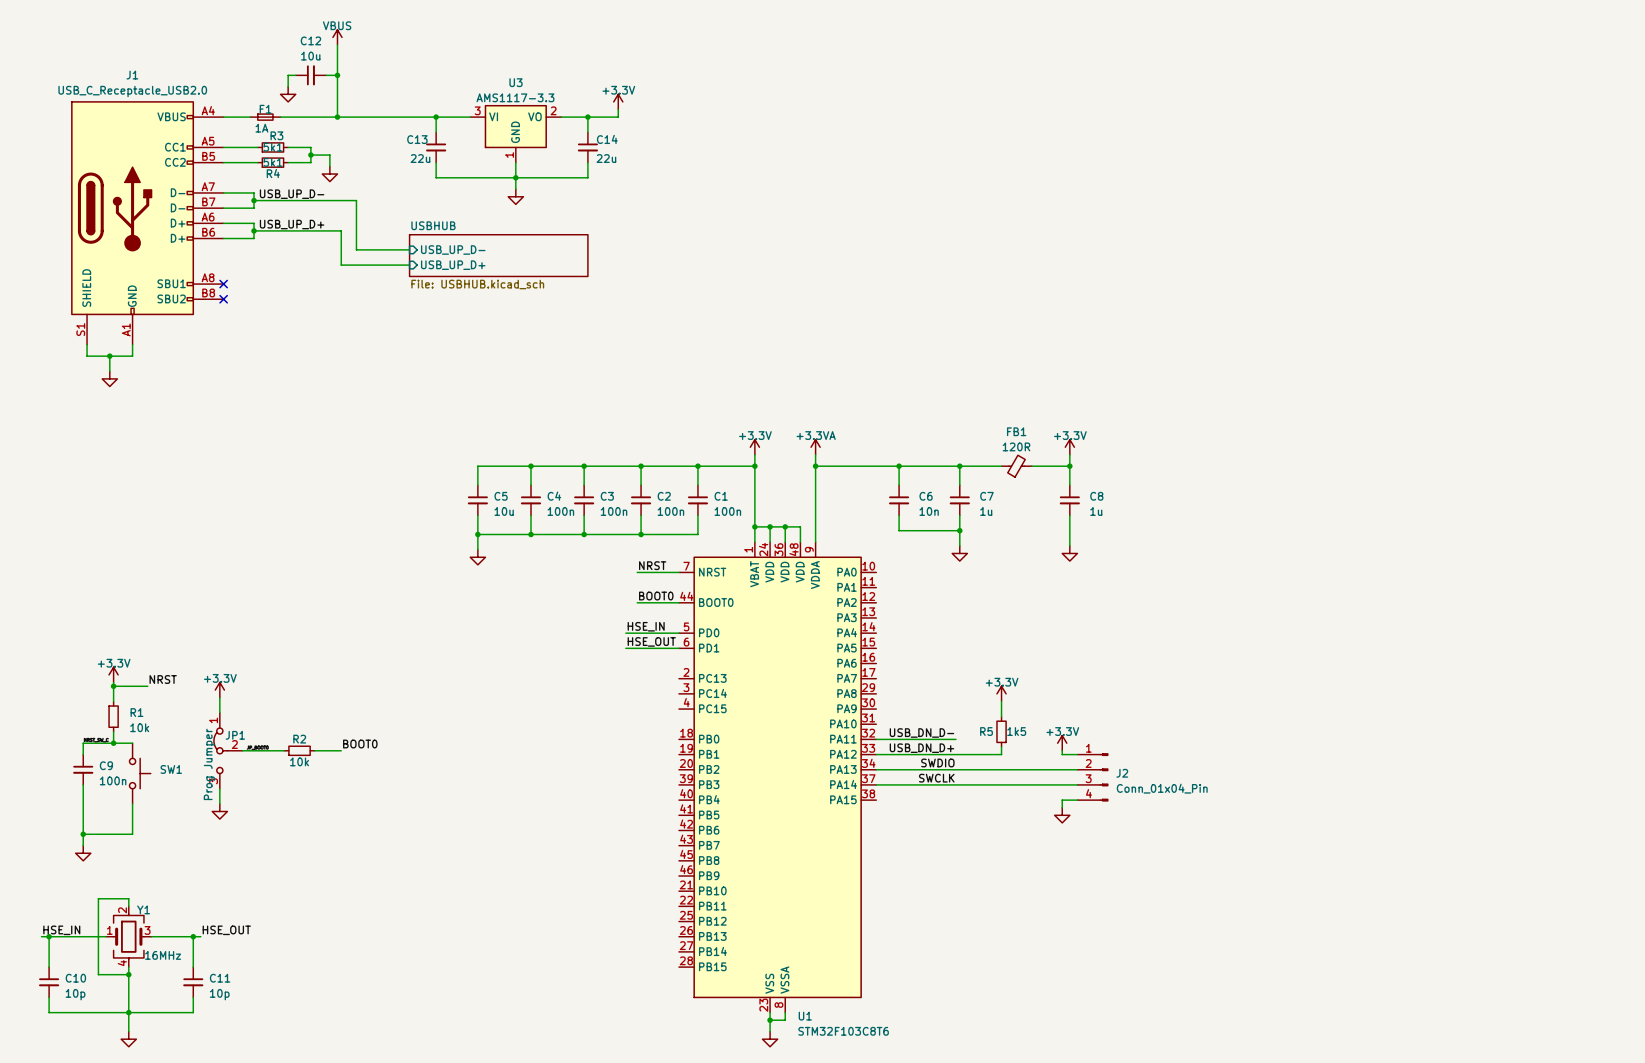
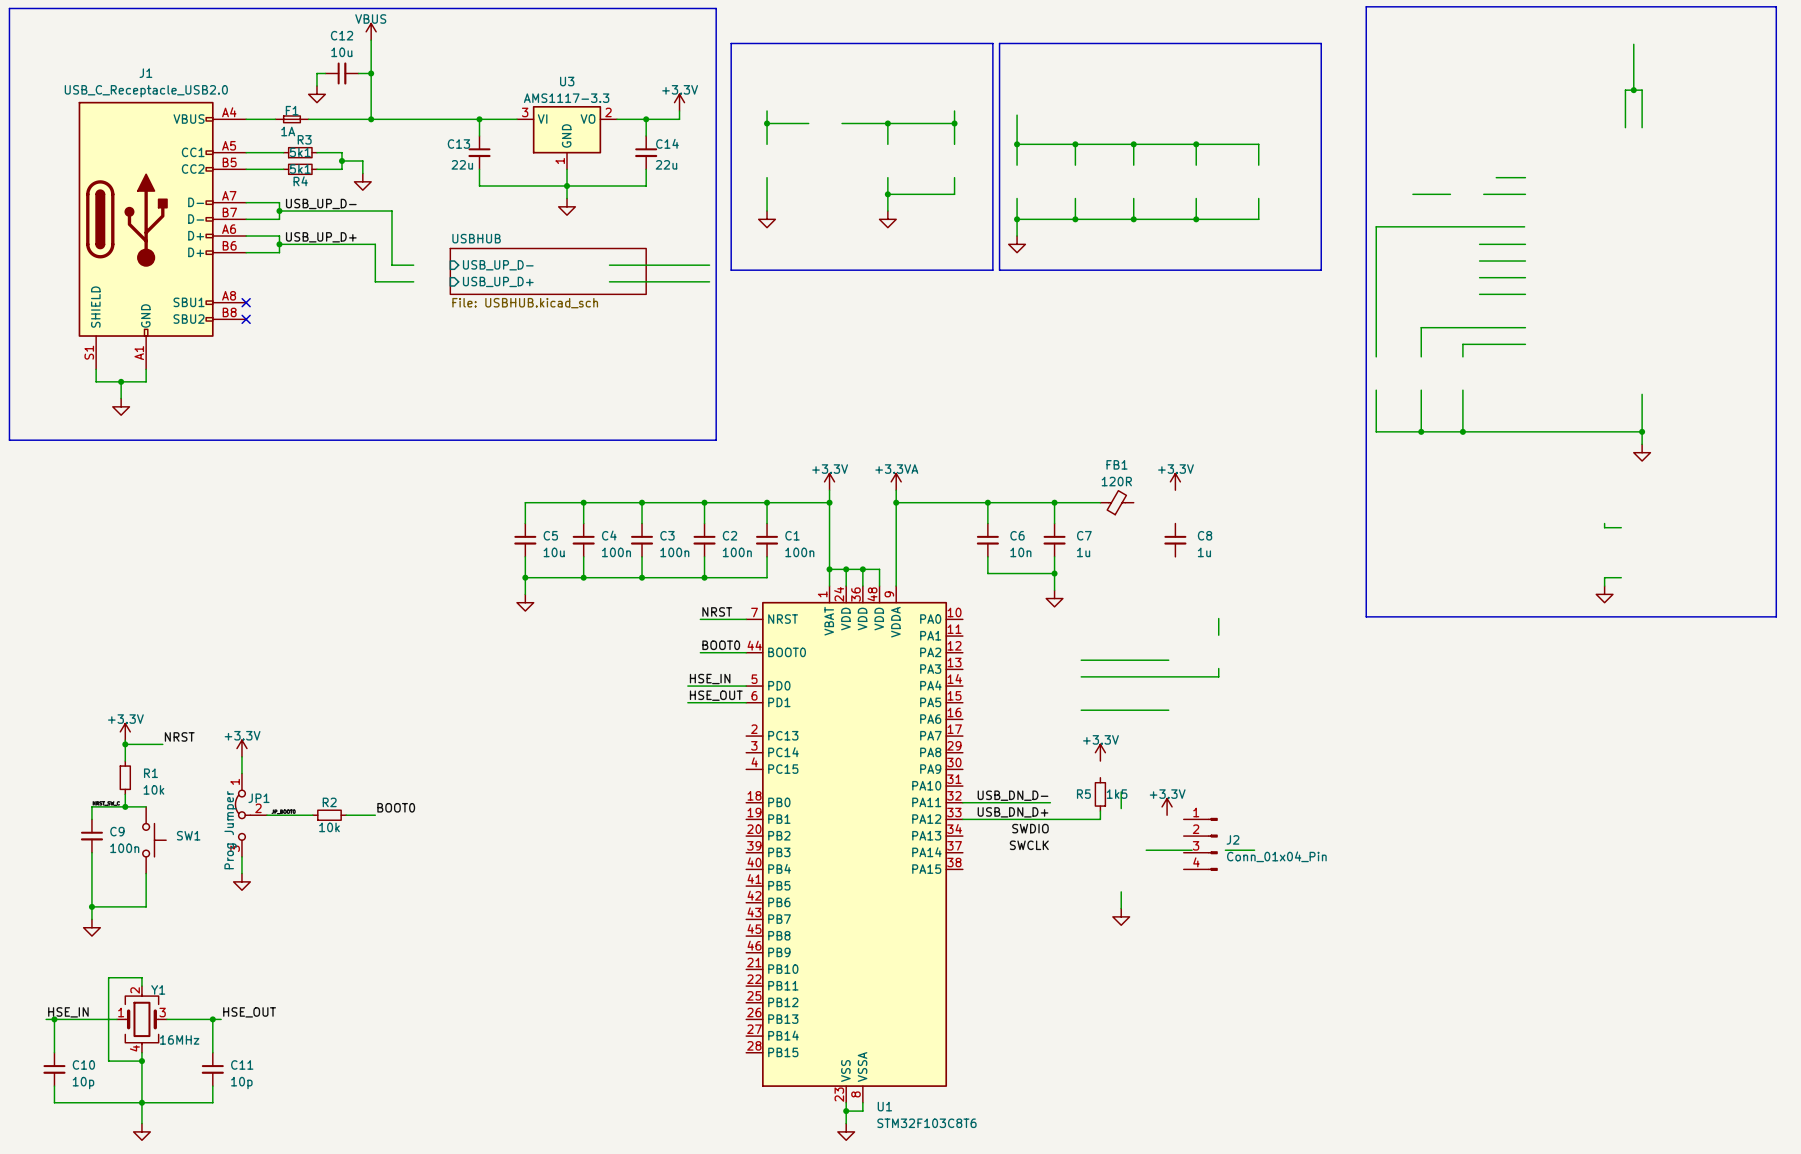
line: none -> (1366, 6) (1776, 6) (1776, 616) (1366, 616) (1366, 6)
line: none -> (9, 8) (716, 8) (716, 440) (9, 440) (9, 8)
line: none -> (731, 43) (992, 43) (992, 270) (731, 270) (731, 43)
line: none -> (999, 43) (1321, 43) (1321, 270) (999, 270) (999, 43)
wire: none -> (1633, 44) (1633, 90)
junction: none -> (1633, 90)
wire: none -> (767, 110) (767, 144)
wire: none -> (954, 110) (954, 144)
wire: none -> (1017, 115) (1017, 165)
wire: none -> (767, 123) (808, 123)
junction: none -> (767, 123)
wire: none -> (842, 123) (954, 123)
wire: none -> (887, 123) (887, 144)
junction: none -> (887, 123)
junction: none -> (954, 123)
wire: none -> (1625, 127) (1625, 90) (1642, 90) (1642, 127)
wire: none -> (1017, 144) (1258, 144) (1258, 165)
junction: none -> (1017, 144)
wire: none -> (1075, 144) (1075, 165)
junction: none -> (1075, 144)
wire: none -> (1133, 144) (1133, 165)
junction: none -> (1133, 144)
wire: none -> (1196, 144) (1196, 165)
junction: none -> (1196, 144)
wire: none -> (767, 177) (767, 211)
wire: none -> (887, 177) (887, 211)
wire: none -> (954, 177) (954, 194) (887, 194)
wire: none -> (1496, 177) (1525, 177)
junction: none -> (887, 194)
wire: none -> (1412, 194) (1450, 194)
wire: none -> (1483, 194) (1525, 194)
wire: none -> (1017, 198) (1017, 236)
wire: none -> (1075, 198) (1075, 219)
wire: none -> (1133, 198) (1133, 219)
wire: none -> (1196, 198) (1196, 219)
wire: none -> (1258, 198) (1258, 219) (1017, 219)
power symbol: none -> (767, 219)
power symbol: none -> (887, 219)
junction: none -> (1017, 219)
junction: none -> (1075, 219)
junction: none -> (1133, 219)
junction: none -> (1196, 219)
wire: none -> (1524, 226) (1376, 226) (1376, 356)
power symbol: none -> (1017, 244)
wire: none -> (1479, 244) (1525, 244)
wire: none -> (1479, 261) (1525, 261)
wire: (376, 249) (409, 249) -> none
wire: none -> (609, 265) (709, 265)
wire: none -> (1479, 277) (1525, 277)
wire: (376, 265) (409, 265) -> none
wire: none -> (609, 281) (709, 281)
wire: none -> (1479, 294) (1525, 294)
wire: none -> (1525, 327) (1421, 327) (1421, 356)
wire: none -> (1525, 344) (1462, 344) (1462, 356)
wire: none -> (1376, 390) (1376, 431) (1642, 431)
wire: none -> (1421, 390) (1421, 431)
wire: none -> (1462, 390) (1462, 431)
wire: none -> (1642, 394) (1642, 444)
junction: none -> (1421, 431)
junction: none -> (1462, 431)
junction: none -> (1642, 431)
power symbol: none -> (1642, 452)
wire: (1069, 454) (1069, 485) -> none
wire: (1031, 466) (1069, 466) -> none
junction: (1069, 466) -> none
wire: none -> (1604, 523) (1604, 527) (1621, 527)
wire: (1069, 515) (1069, 545) -> none
wire: none -> (1621, 577) (1604, 577) (1604, 586)
power symbol: none -> (1604, 594)
power symbol: (1069, 553) -> none
wire: none -> (1218, 618) (1218, 635)
wire: none -> (1081, 660) (1168, 660)
wire: none -> (1218, 668) (1218, 676) (1081, 676)
wire: none -> (1081, 710) (1168, 710)
wire: (1001, 701) (1001, 716) -> (1121, 791) (1121, 808)
wire: (1062, 750) (1062, 754) (1077, 754) -> none
wire: (876, 769) (1077, 769) -> none
wire: none -> (1146, 850) (1192, 850)
wire: none -> (1225, 850) (1254, 850)
wire: (876, 784) (1077, 784) -> none
wire: (1077, 800) (1062, 800) (1062, 807) -> none
power symbol position: (1062, 815) -> (1121, 916)
wire: none -> (1121, 891) (1121, 908)

